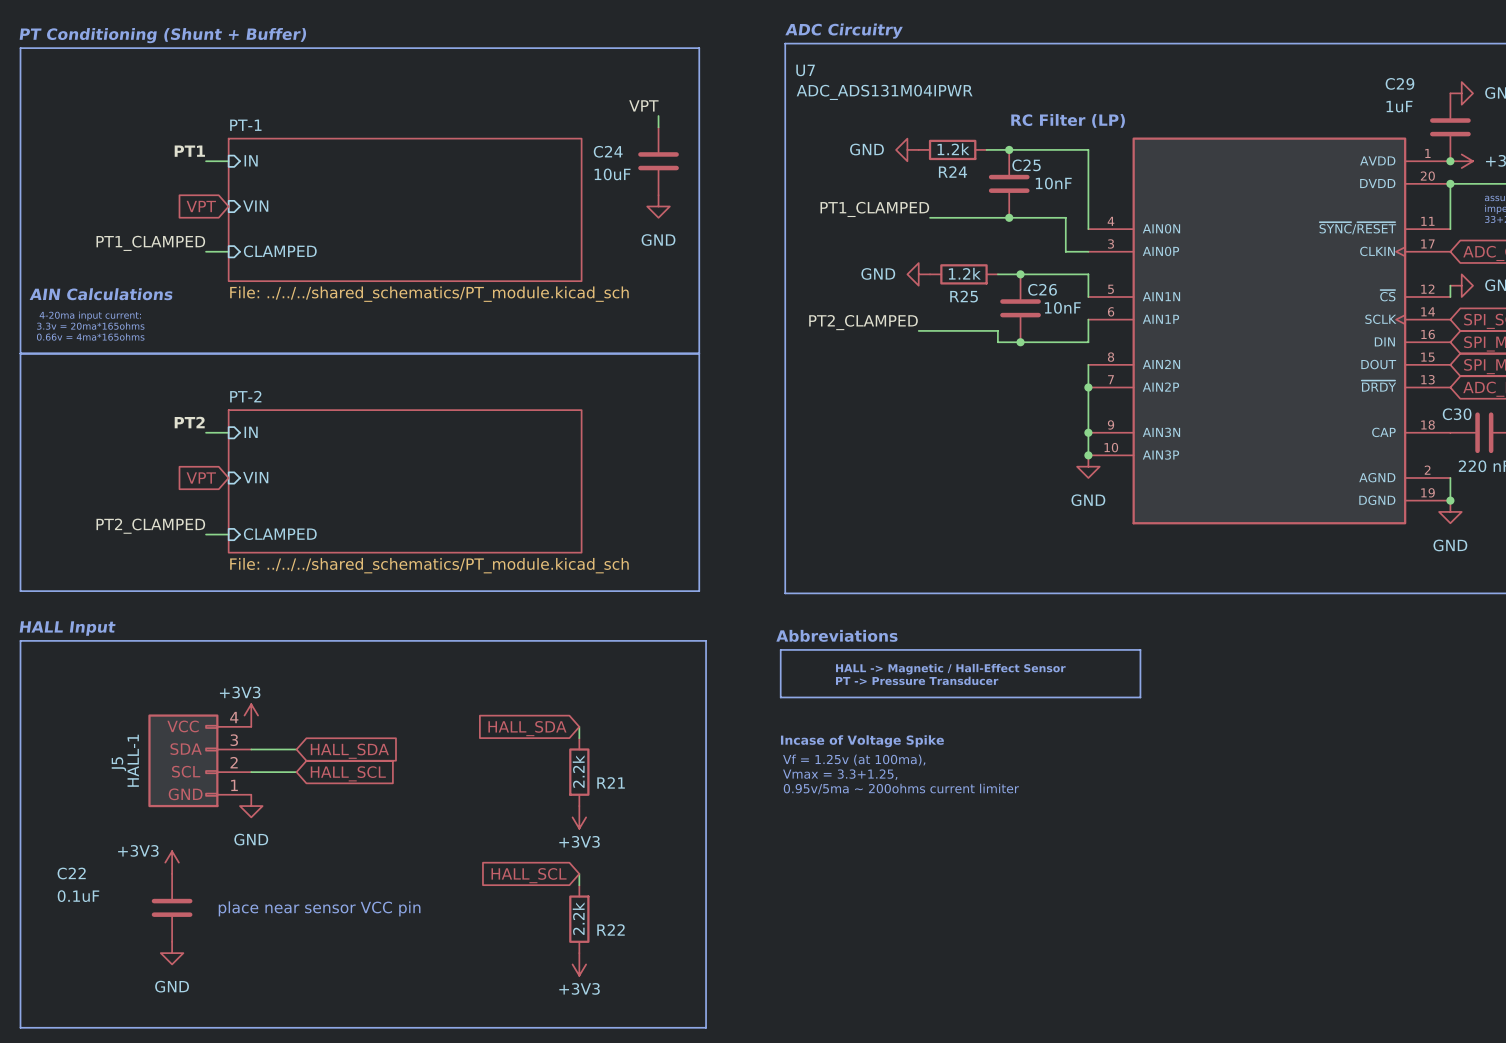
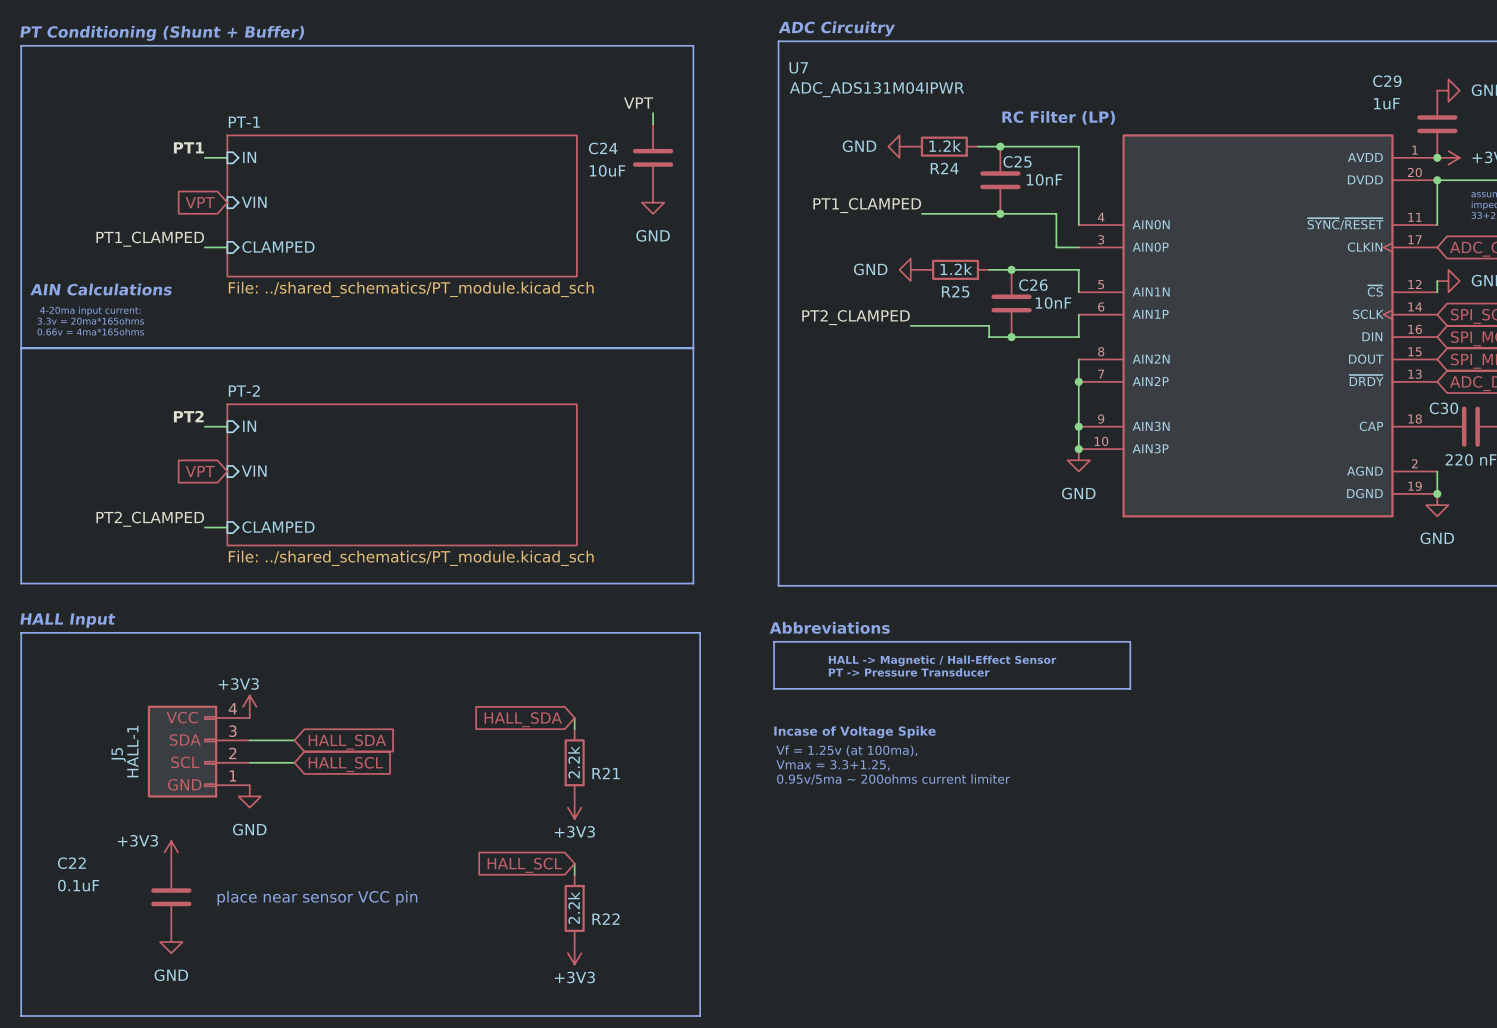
sheet PT-1 value: File: ../../../shared_schematics/PT_module.kicad_sch (429, 294) -> File: ../shared_schematics/PT_module.kicad_sch (411, 289)
sheet PT-2 value: File: ../../../shared_schematics/PT_module.kicad_sch (429, 565) -> File: ../shared_schematics/PT_module.kicad_sch (411, 558)

